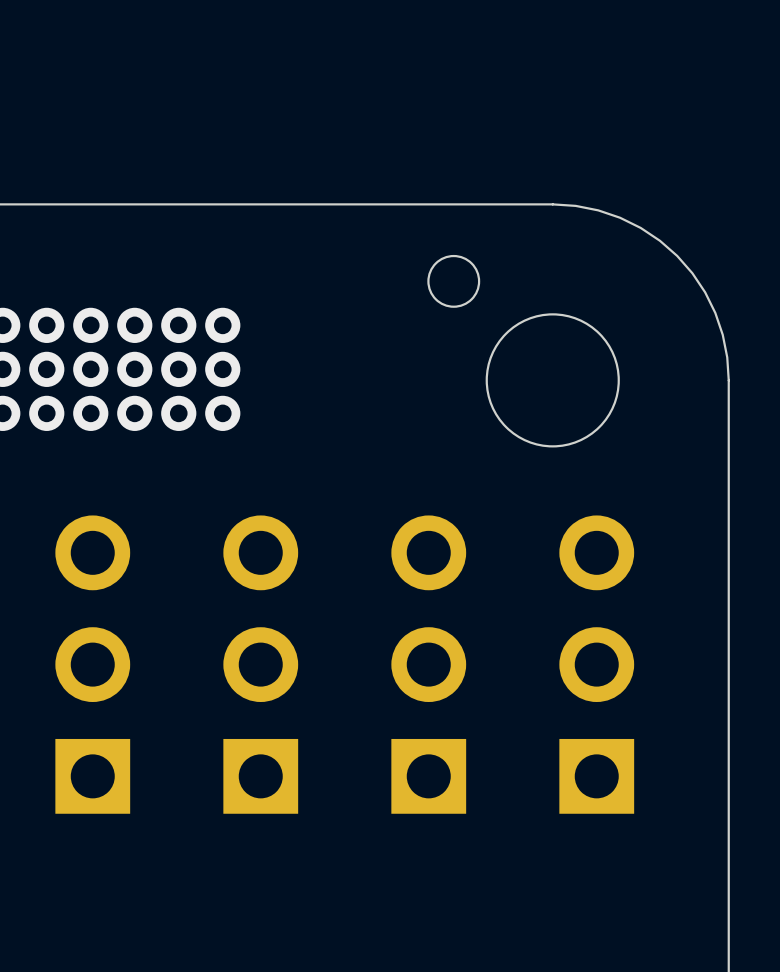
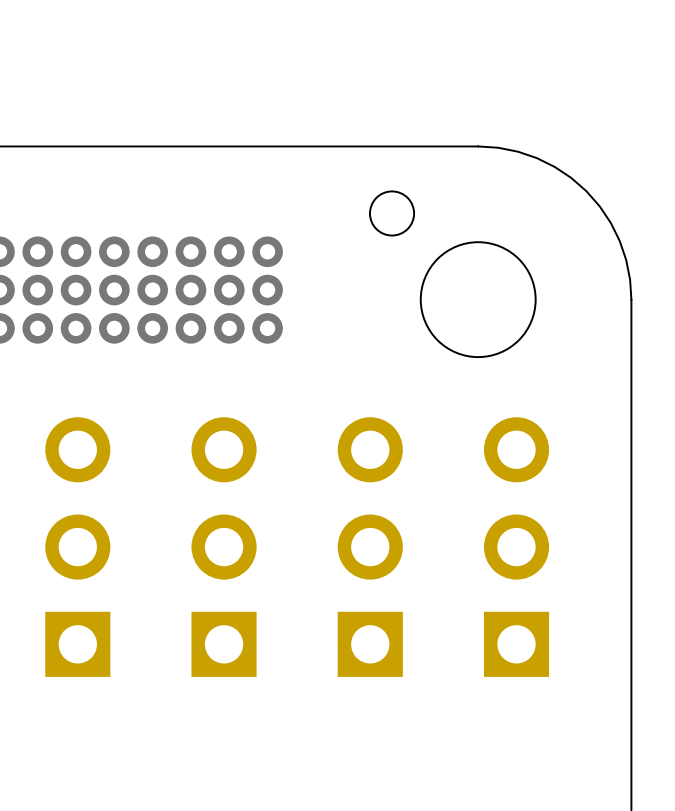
via: none -> (229, 251)
via: none -> (267, 251)
via: none -> (229, 290)
via: none -> (267, 290)
via: none -> (229, 328)
via: none -> (267, 328)

